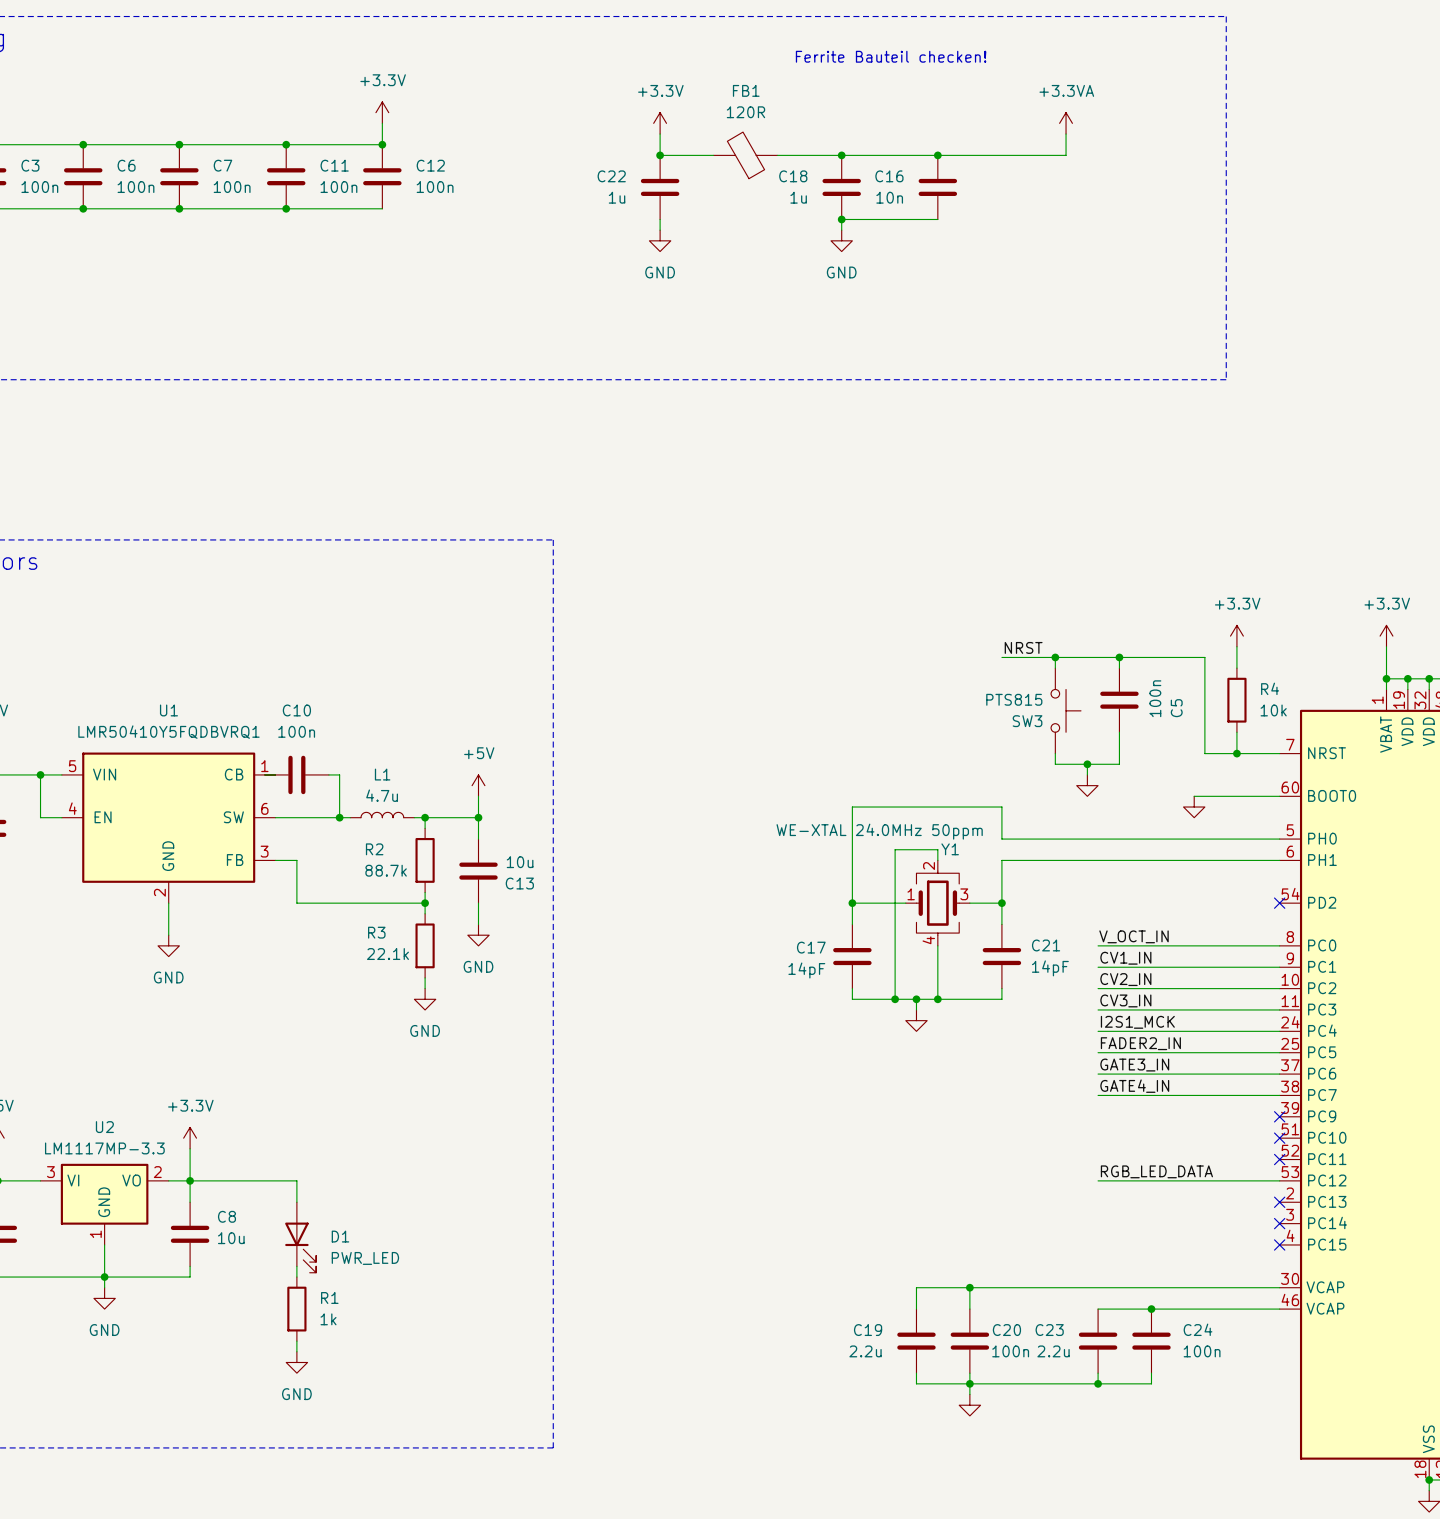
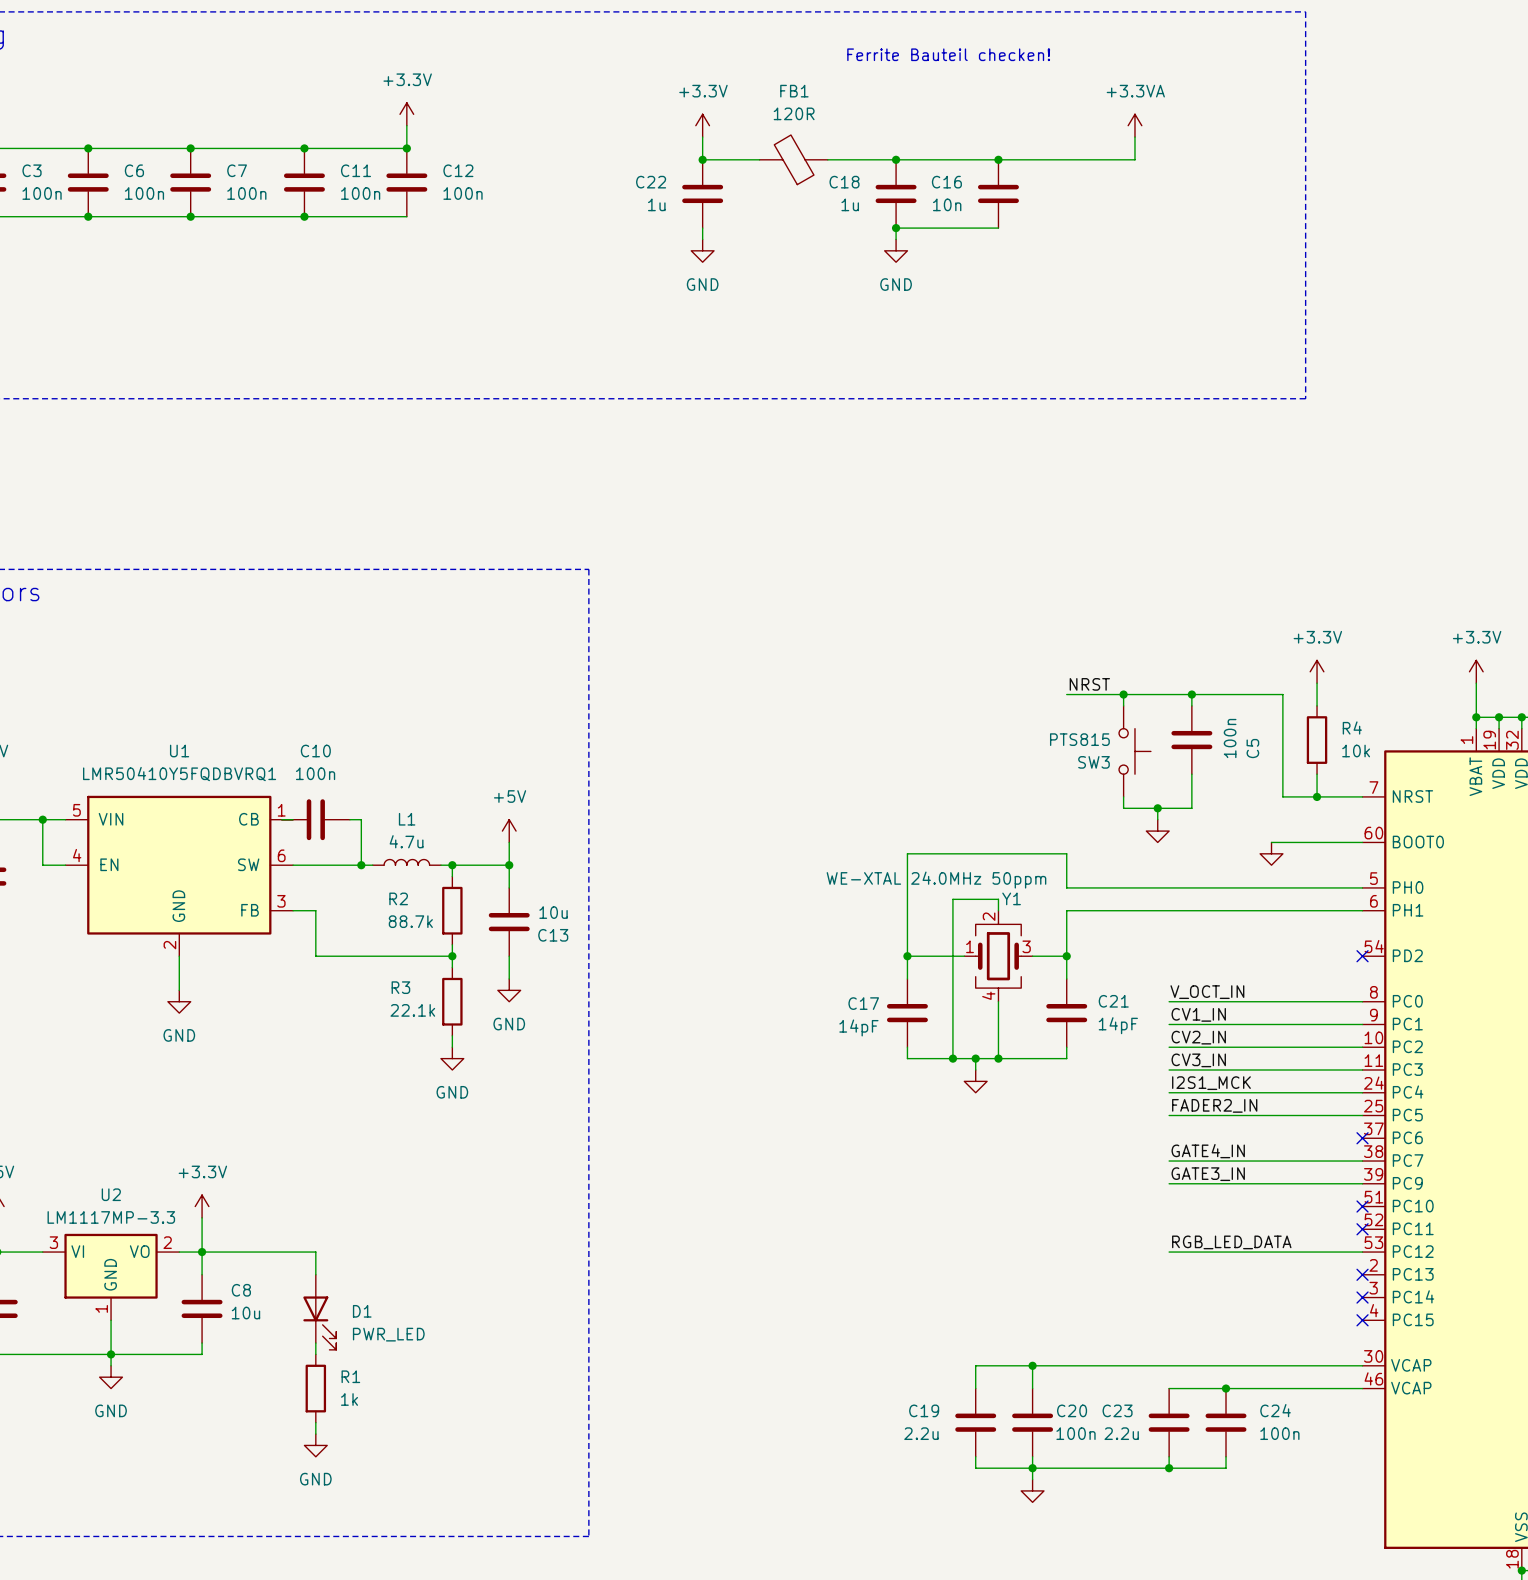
label position: GATE3_IN (1134, 1065) -> GATE3_IN (1208, 1174)
wire: (1098, 1074) (1279, 1074) -> (1169, 1183) (1362, 1183)
no-connect mark position: (1279, 1116) -> (1362, 1138)

